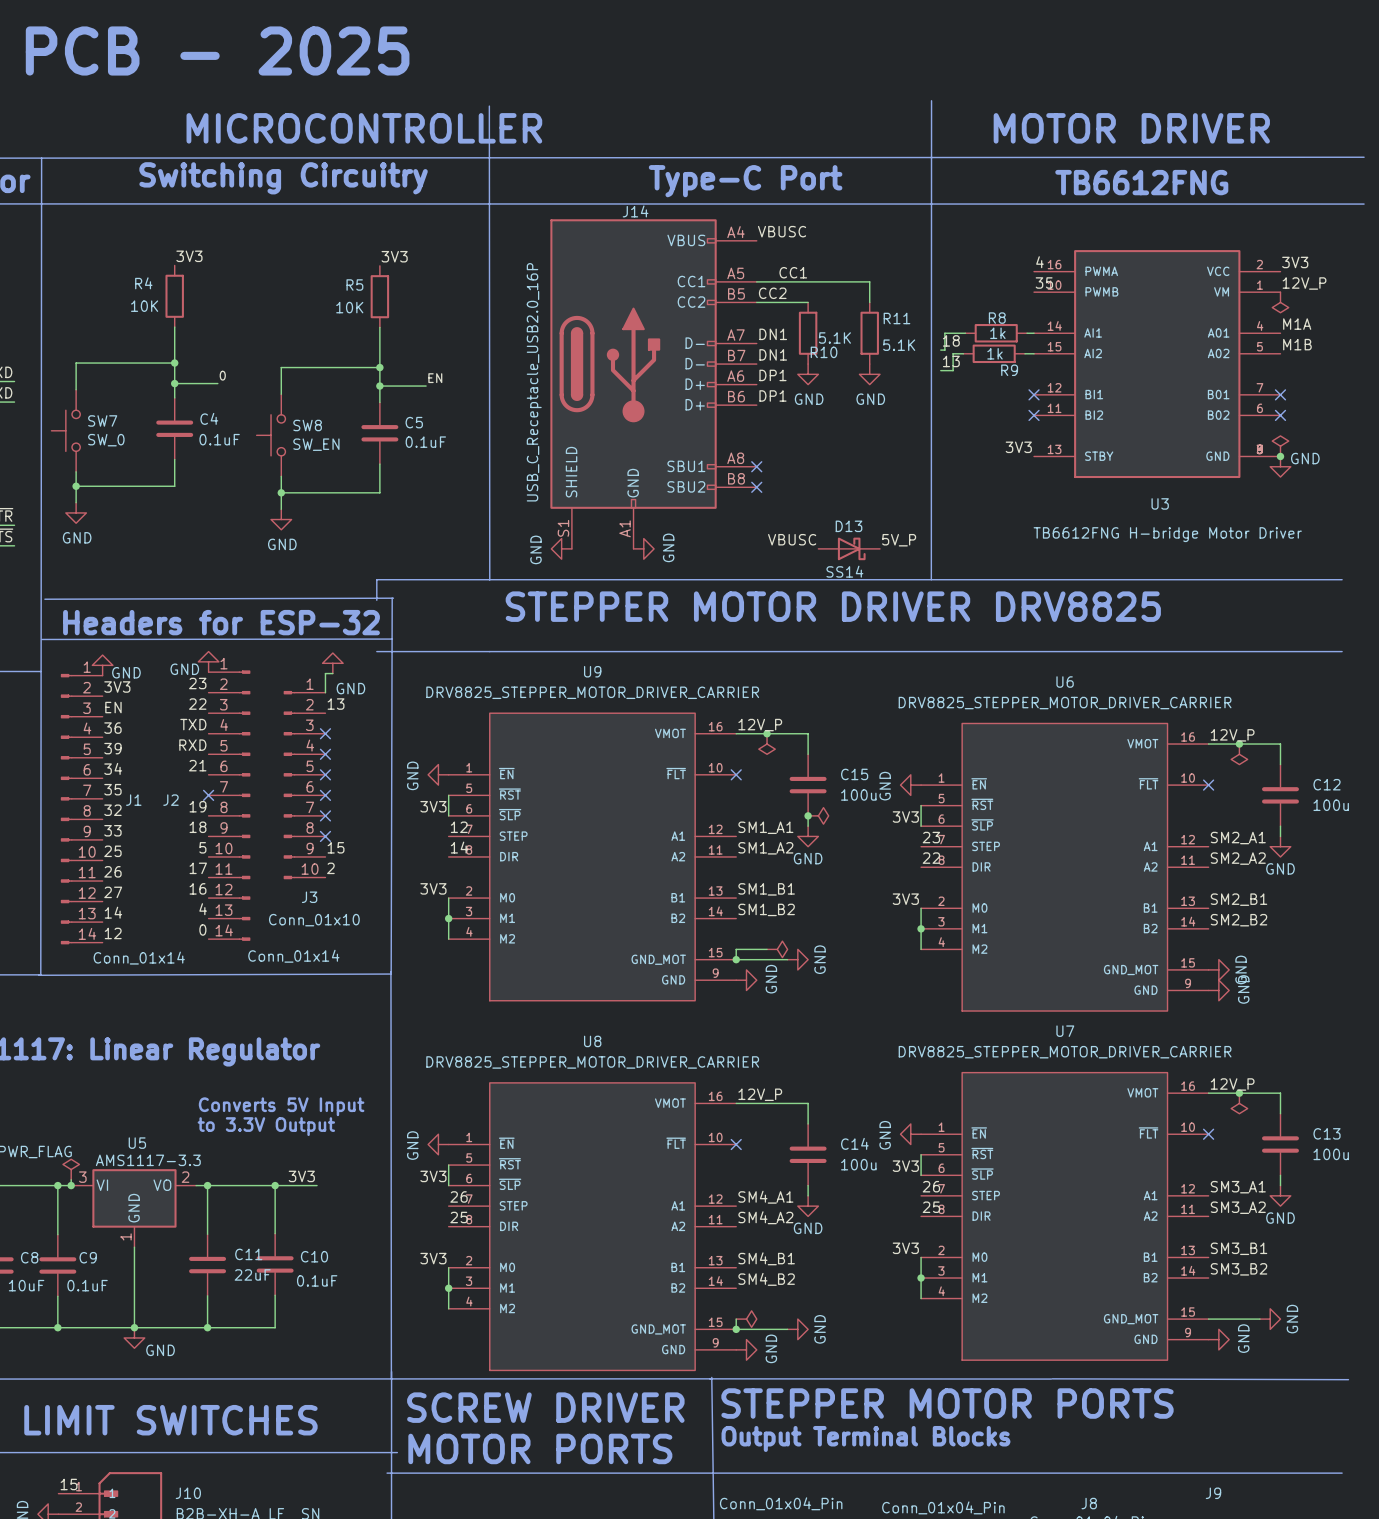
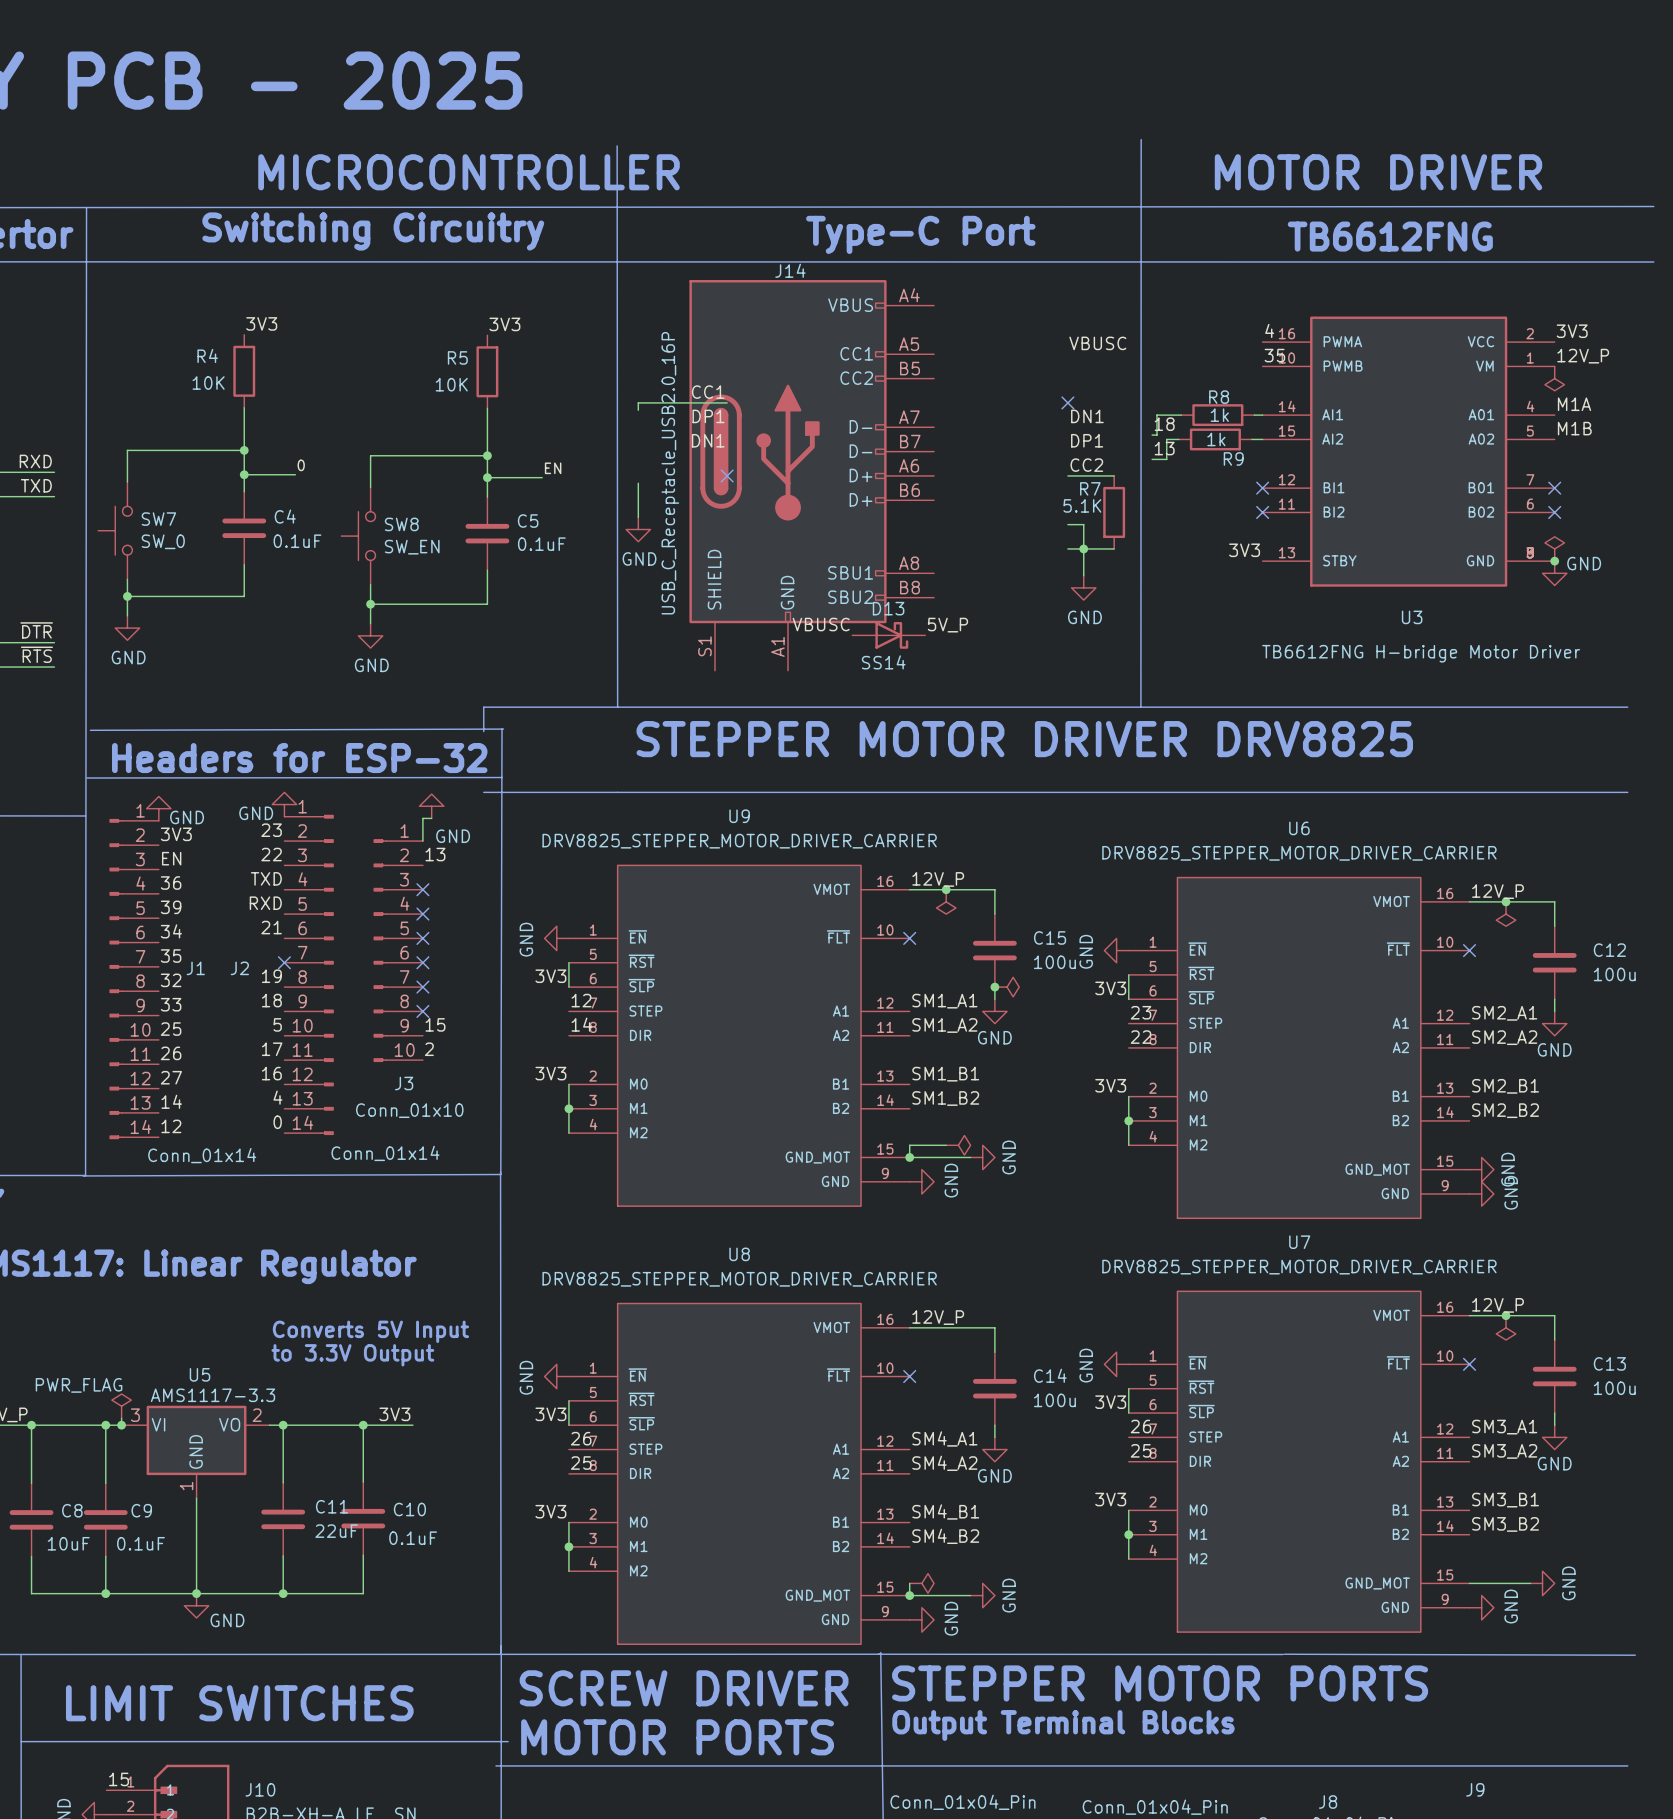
label position: VBUSC (782, 231) -> VBUSC (1097, 343)
label position: CC1 (793, 272) -> CC1 (708, 392)
wire: (756, 281) (869, 281) (869, 302) -> none
label position: CC2 (772, 293) -> CC2 (1086, 465)
wire: (756, 302) (808, 302) -> none
wire: none -> (727, 402) (638, 402) (638, 410)
no-connect mark: none -> (1067, 402)
R10: 5.1K (808, 333) -> none
R11: 5.1K (869, 333) -> none
label: none -> DP1 (708, 416)
label: DN1 (773, 334) -> none
label: none -> DN1 (1087, 416)
label: none -> DN1 (708, 440)
label: DN1 (773, 354) -> none
label: none -> DP1 (1087, 440)
power symbol: GND (808, 374) -> none
power symbol: GND (869, 374) -> none
label: DP1 (772, 375) -> none
no-connect mark: none -> (727, 475)
wire: none -> (1067, 475) (1114, 475)
wire: none -> (638, 483) (638, 517)
label: DP1 (772, 395) -> none
R7: none -> 5.1K (1114, 512)
wire: none -> (1067, 524) (1083, 524) (1083, 575)
power symbol: none -> GND (638, 529)
wire: none -> (1067, 548) (1114, 548)
junction: none -> (1083, 548)
no-connect mark: (756, 466) -> none
power symbol: none -> GND (1083, 587)
no-connect mark: (756, 487) -> none
label position: VBUSC (792, 539) -> VBUSC (821, 624)
label position: 5V_P (899, 540) -> 5V_P (947, 625)
power symbol: GND (561, 548) -> none
power symbol: GND (643, 548) -> none
D13 position: (849, 548) -> (888, 635)

